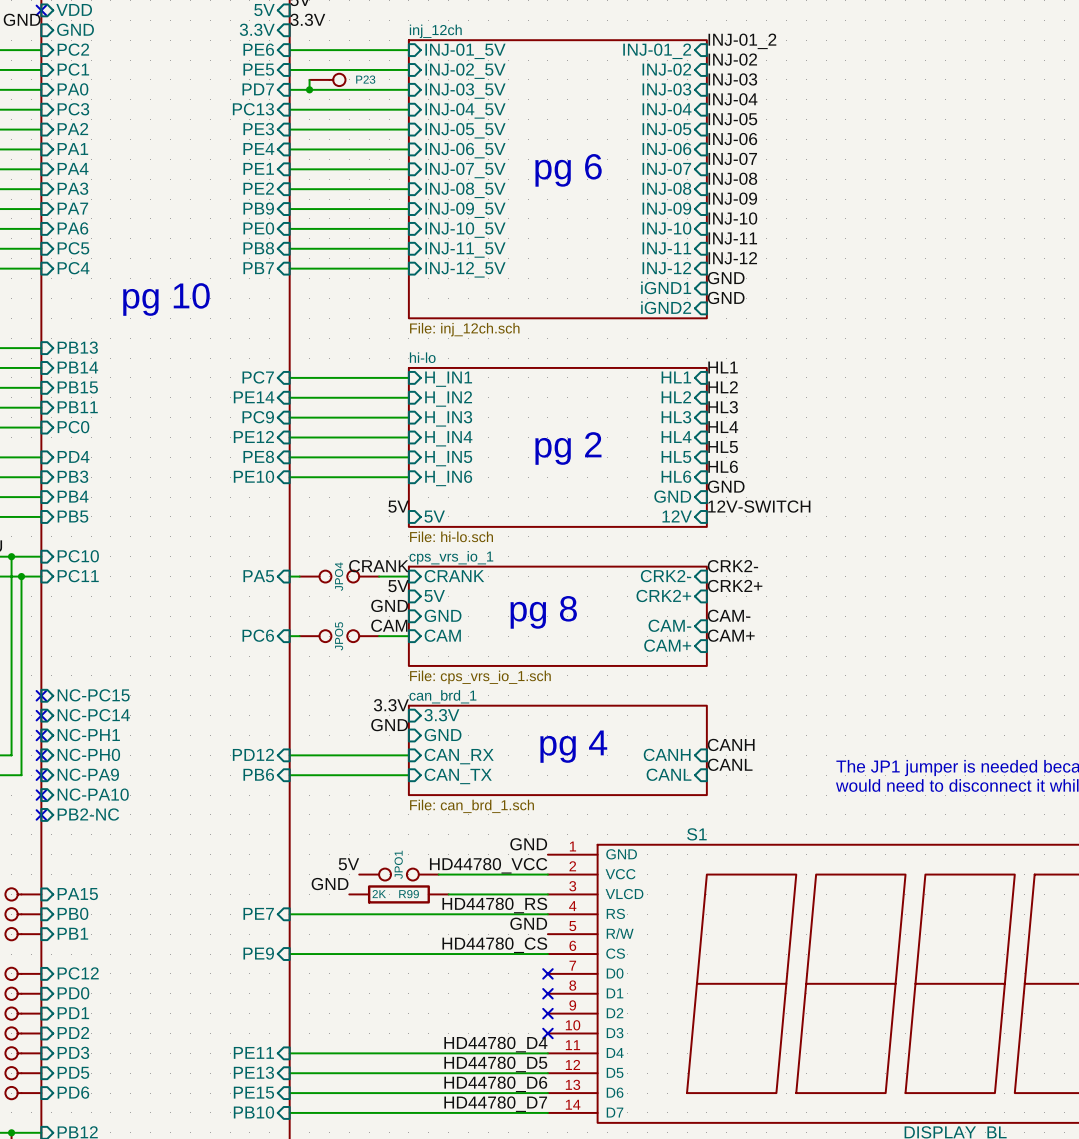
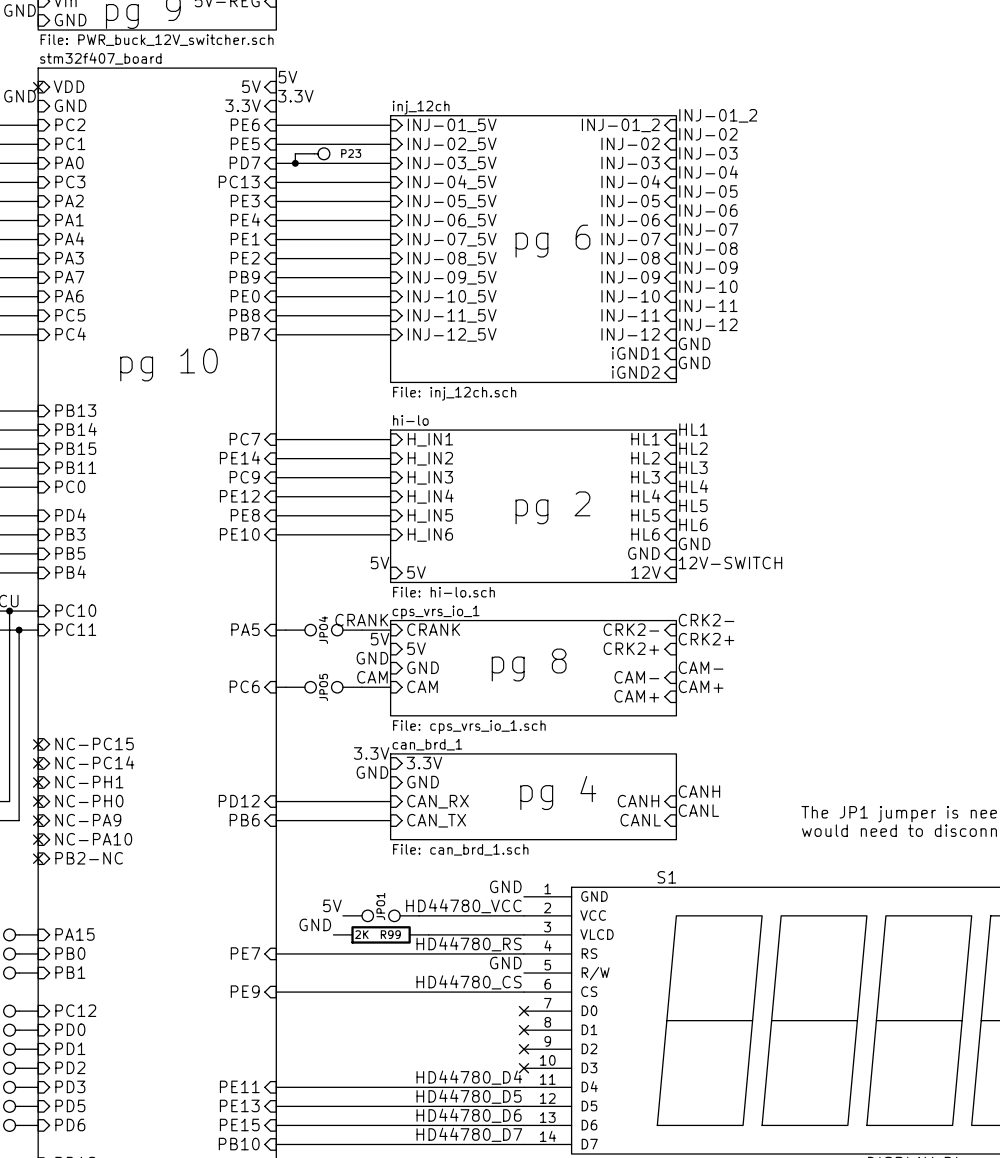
sheet pin: PB4 (73, 496) -> PB5 (70, 553)
sheet pin: PB5 (72, 516) -> PB4 (70, 572)

